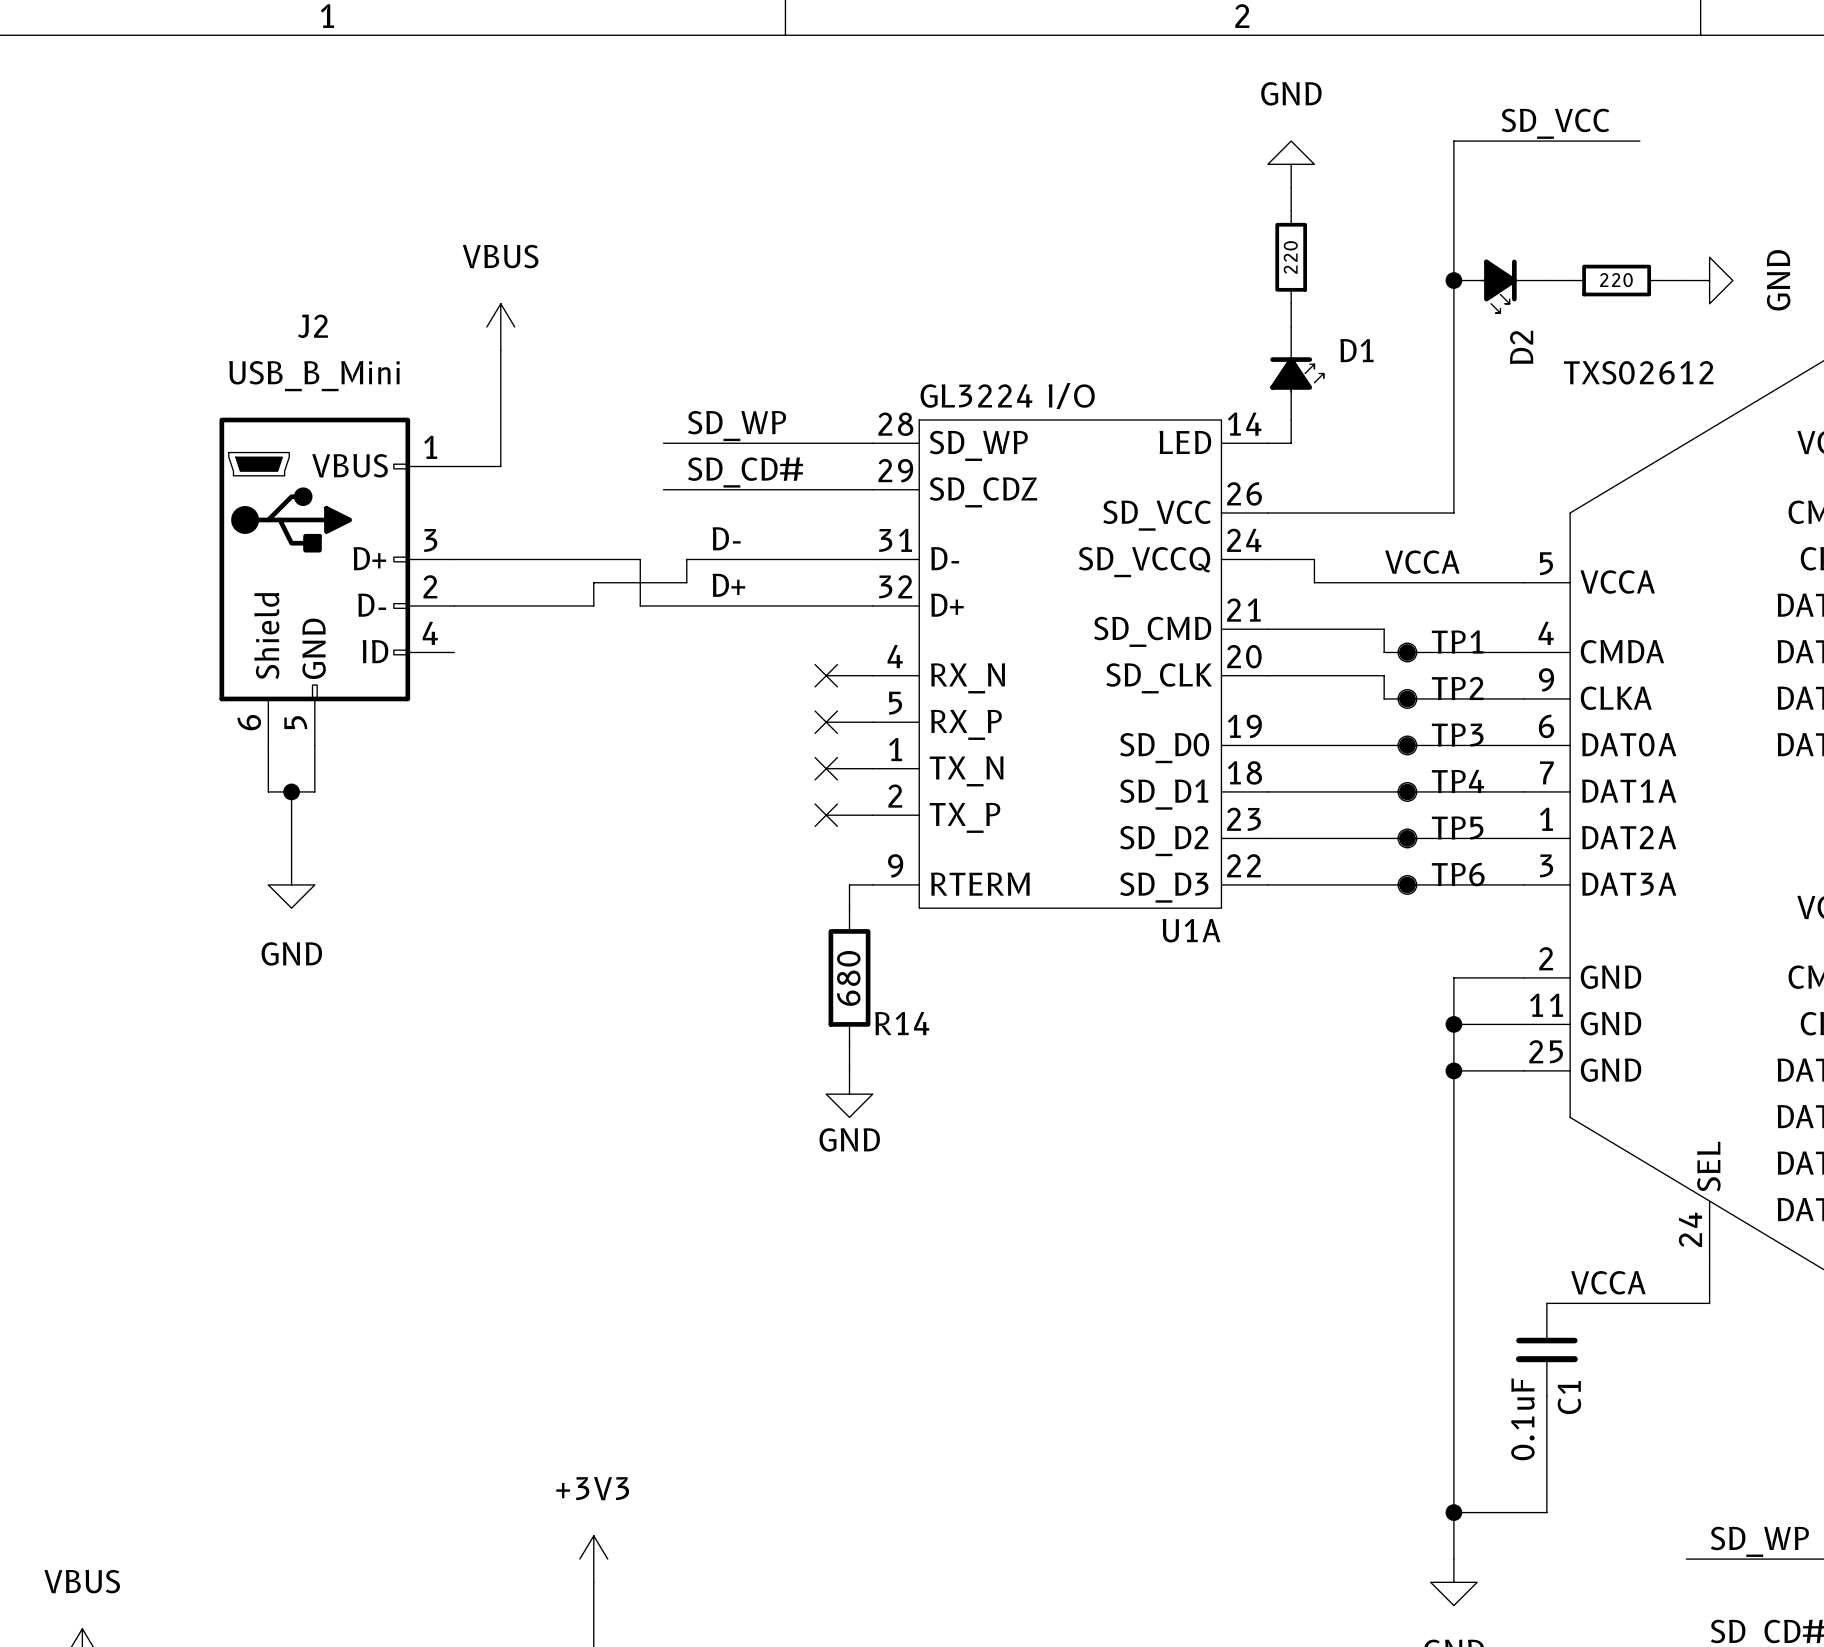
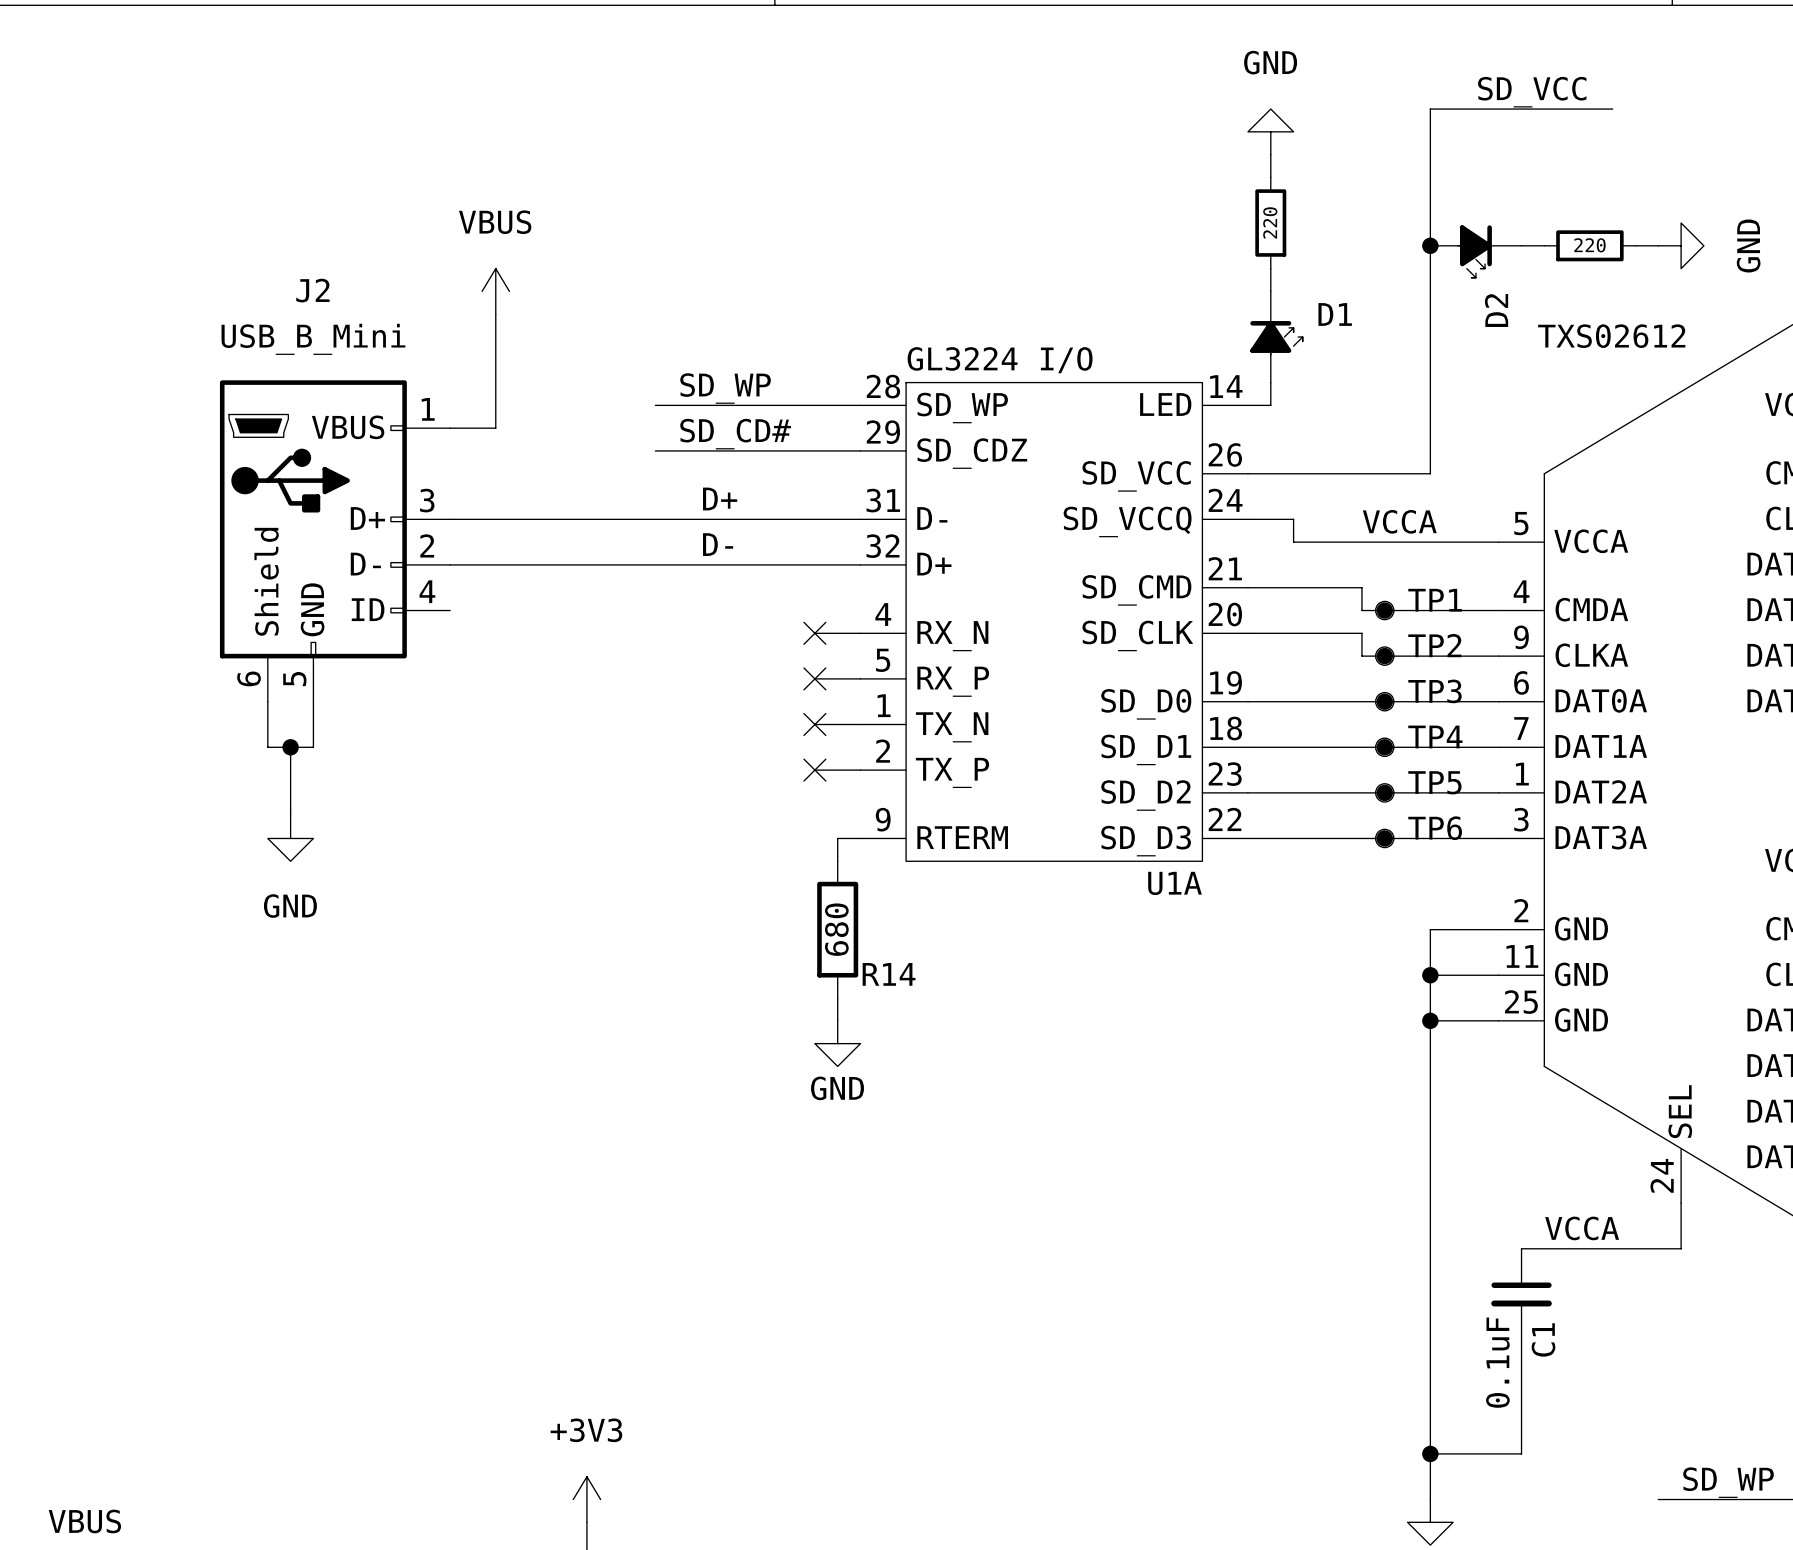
label: D- (726, 538) -> D+ (720, 499)
wire: (640, 559) (640, 605) -> (632, 519) (678, 519)
wire: (686, 559) (686, 582) (593, 582) (593, 605) -> (632, 564) (586, 564)
label: D+ (728, 585) -> D- (718, 544)

